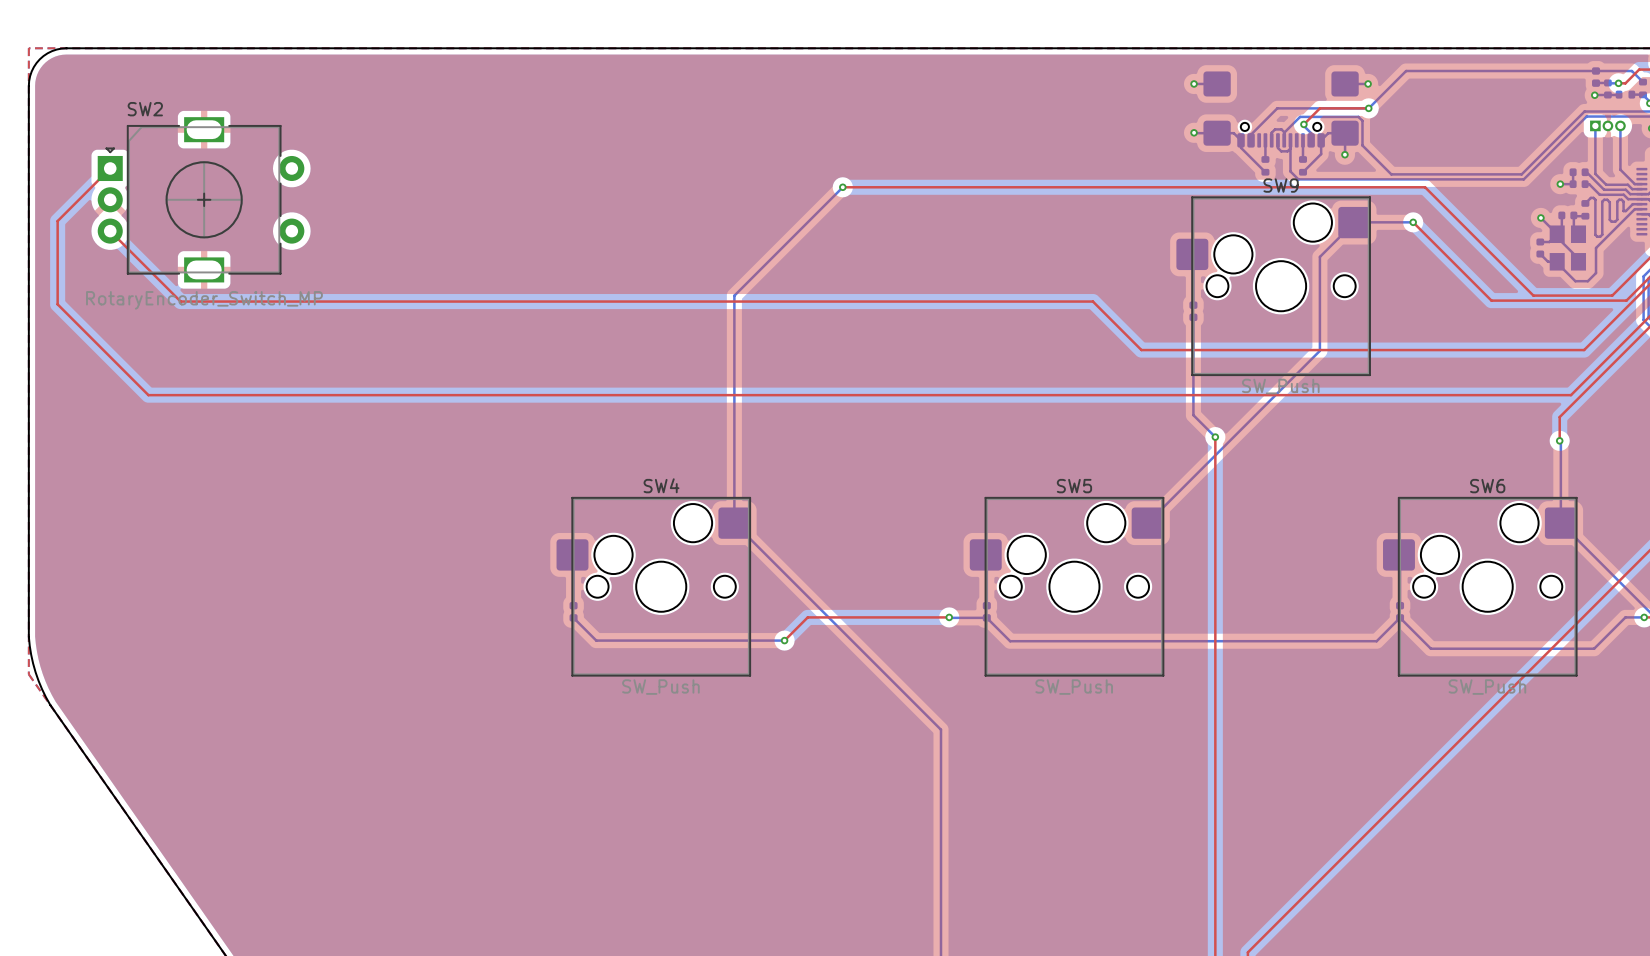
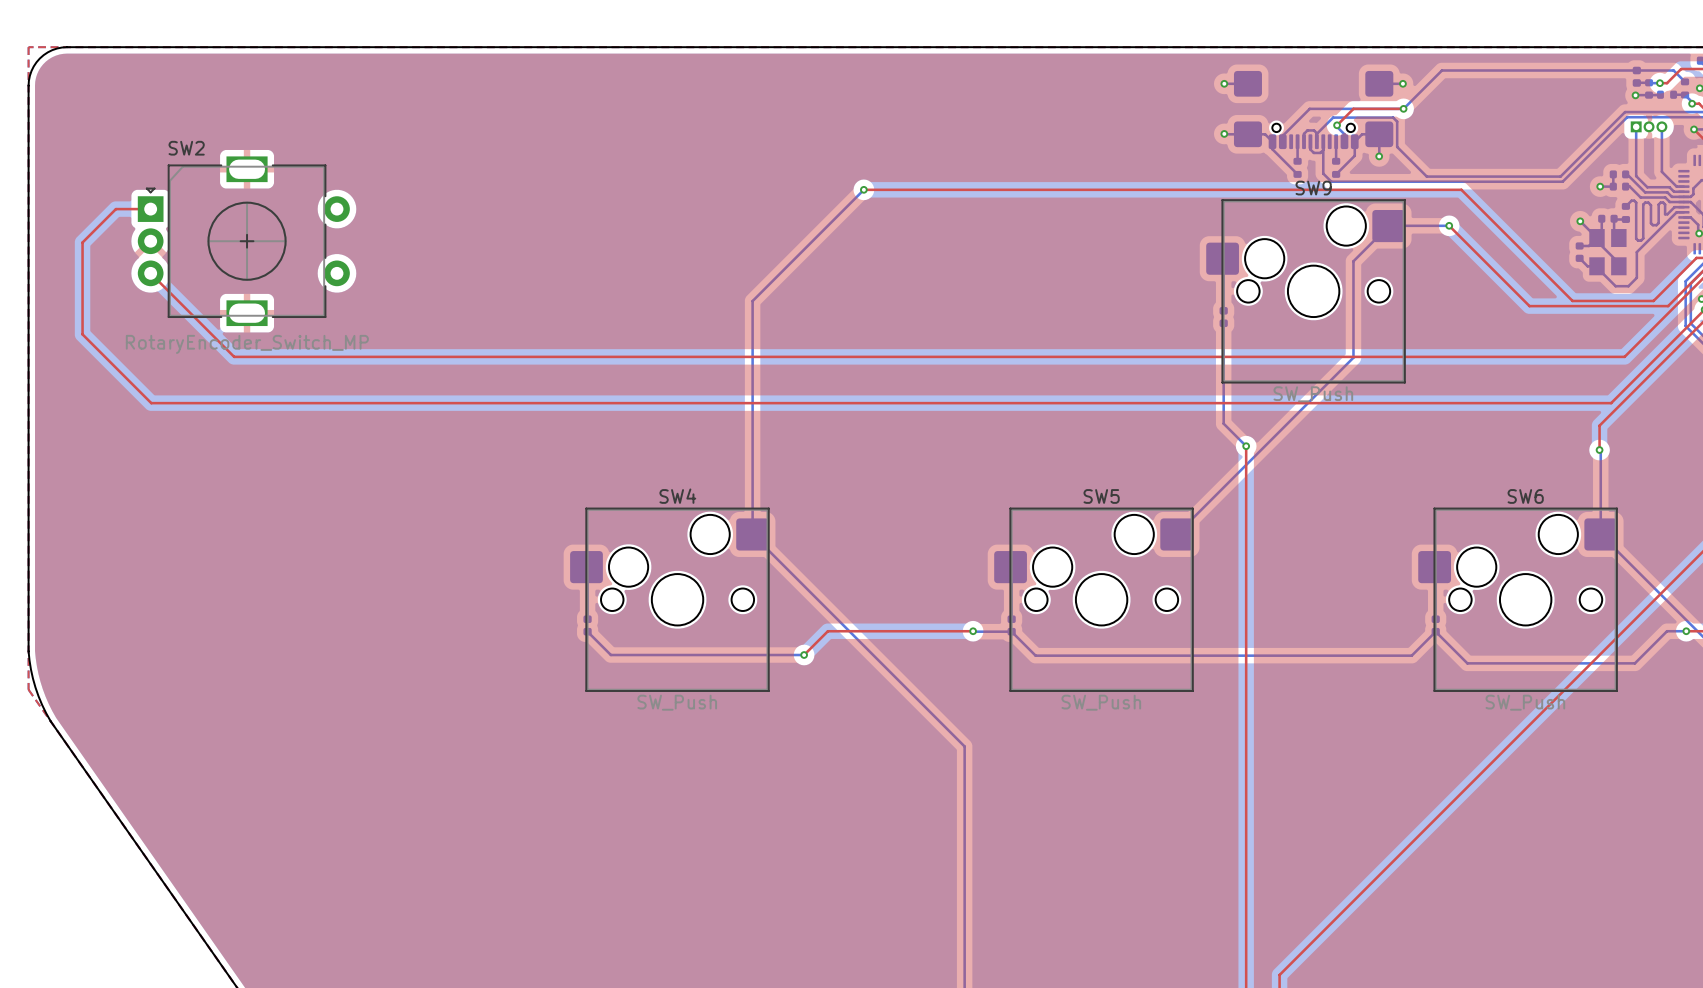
top track: (110, 168) (57, 221) (57, 304) (81, 328) -> (150, 209) (115, 209) (82, 242) (82, 334)
SW2 position: (201, 199) -> (243, 241)
top track: (110, 231) (147, 268) -> none
top track: (180, 301) (1092, 301) (1141, 350) -> (184, 307) (234, 356) (1170, 356)

